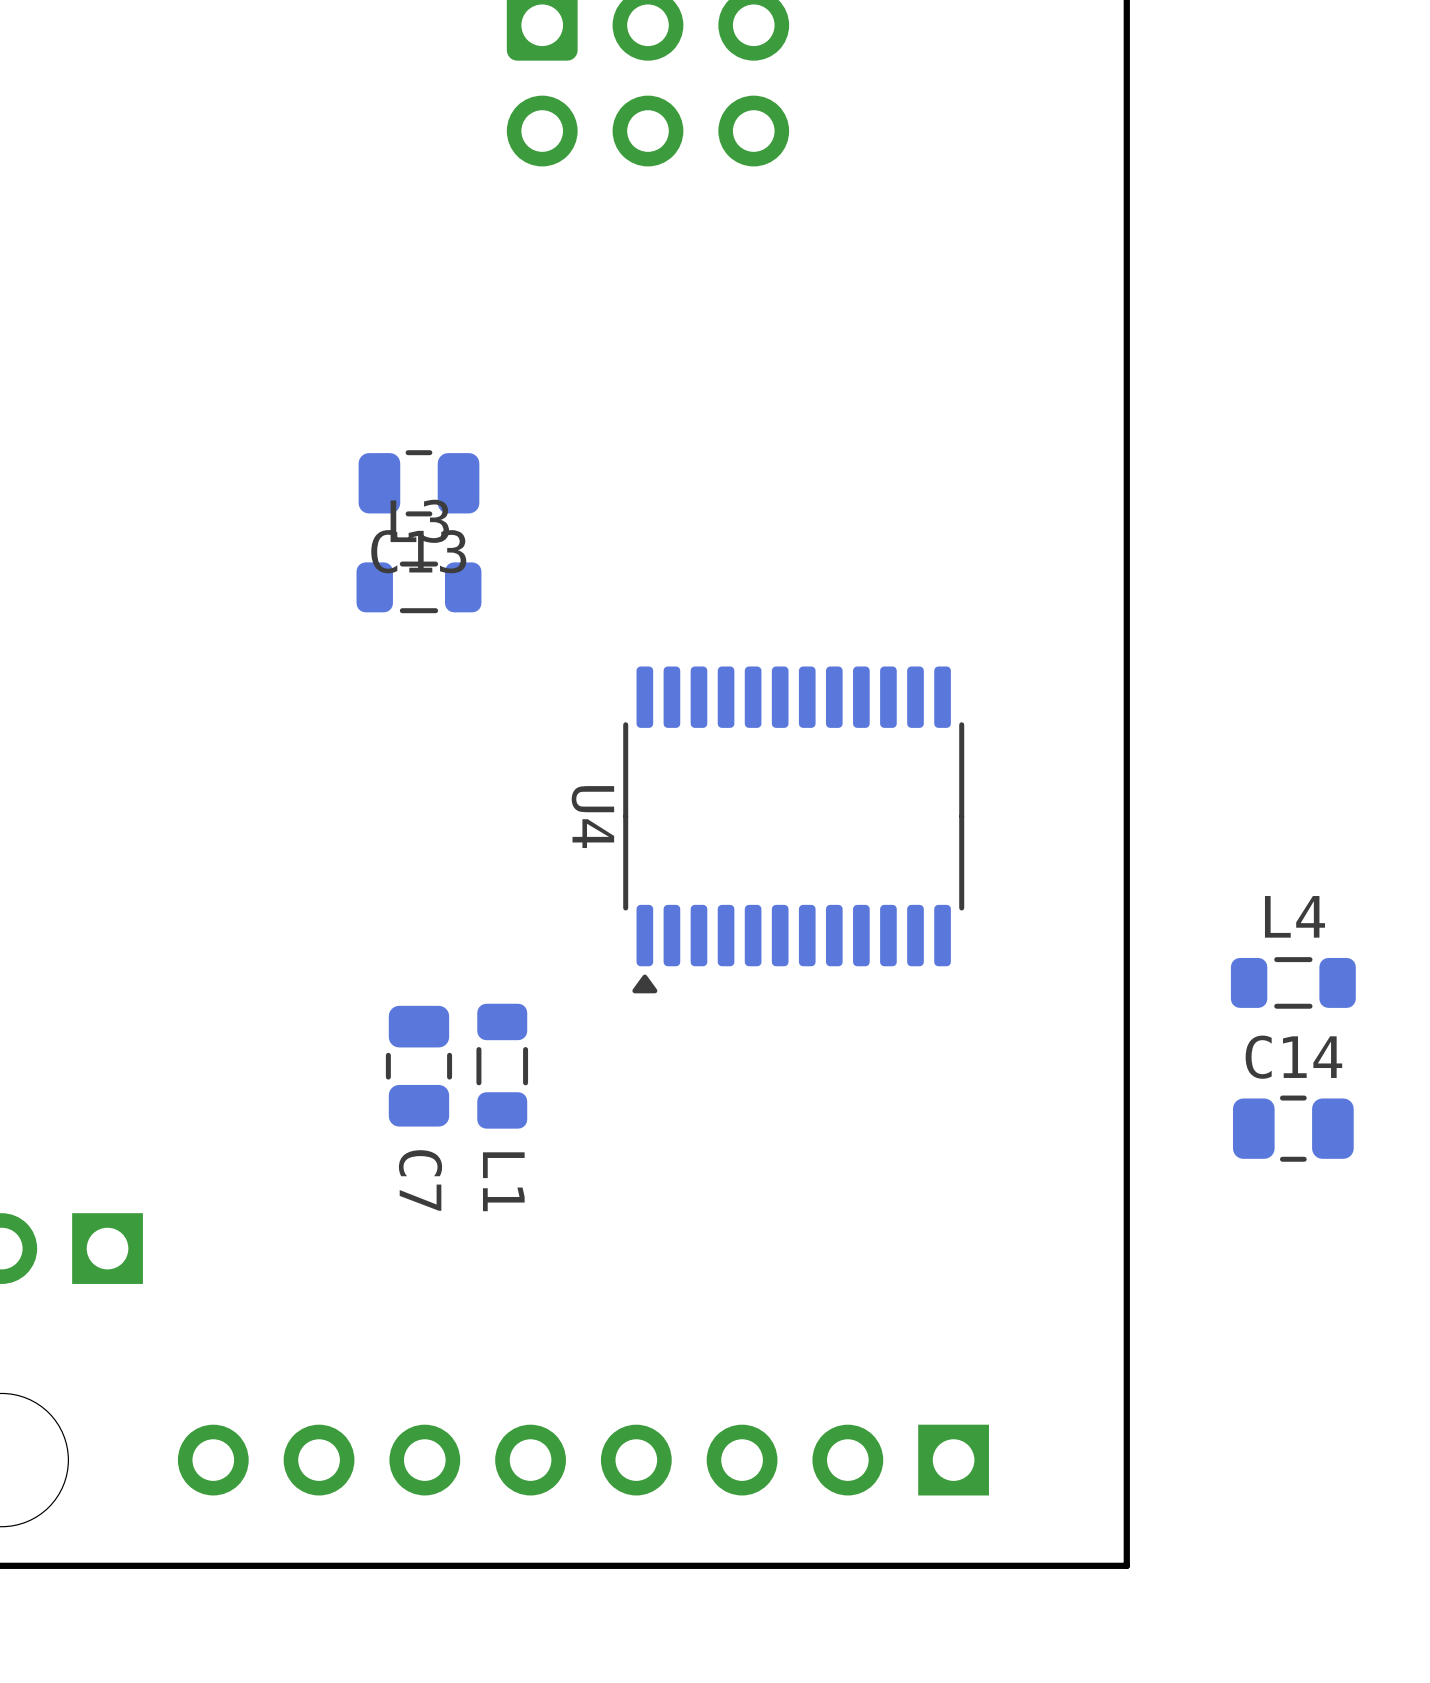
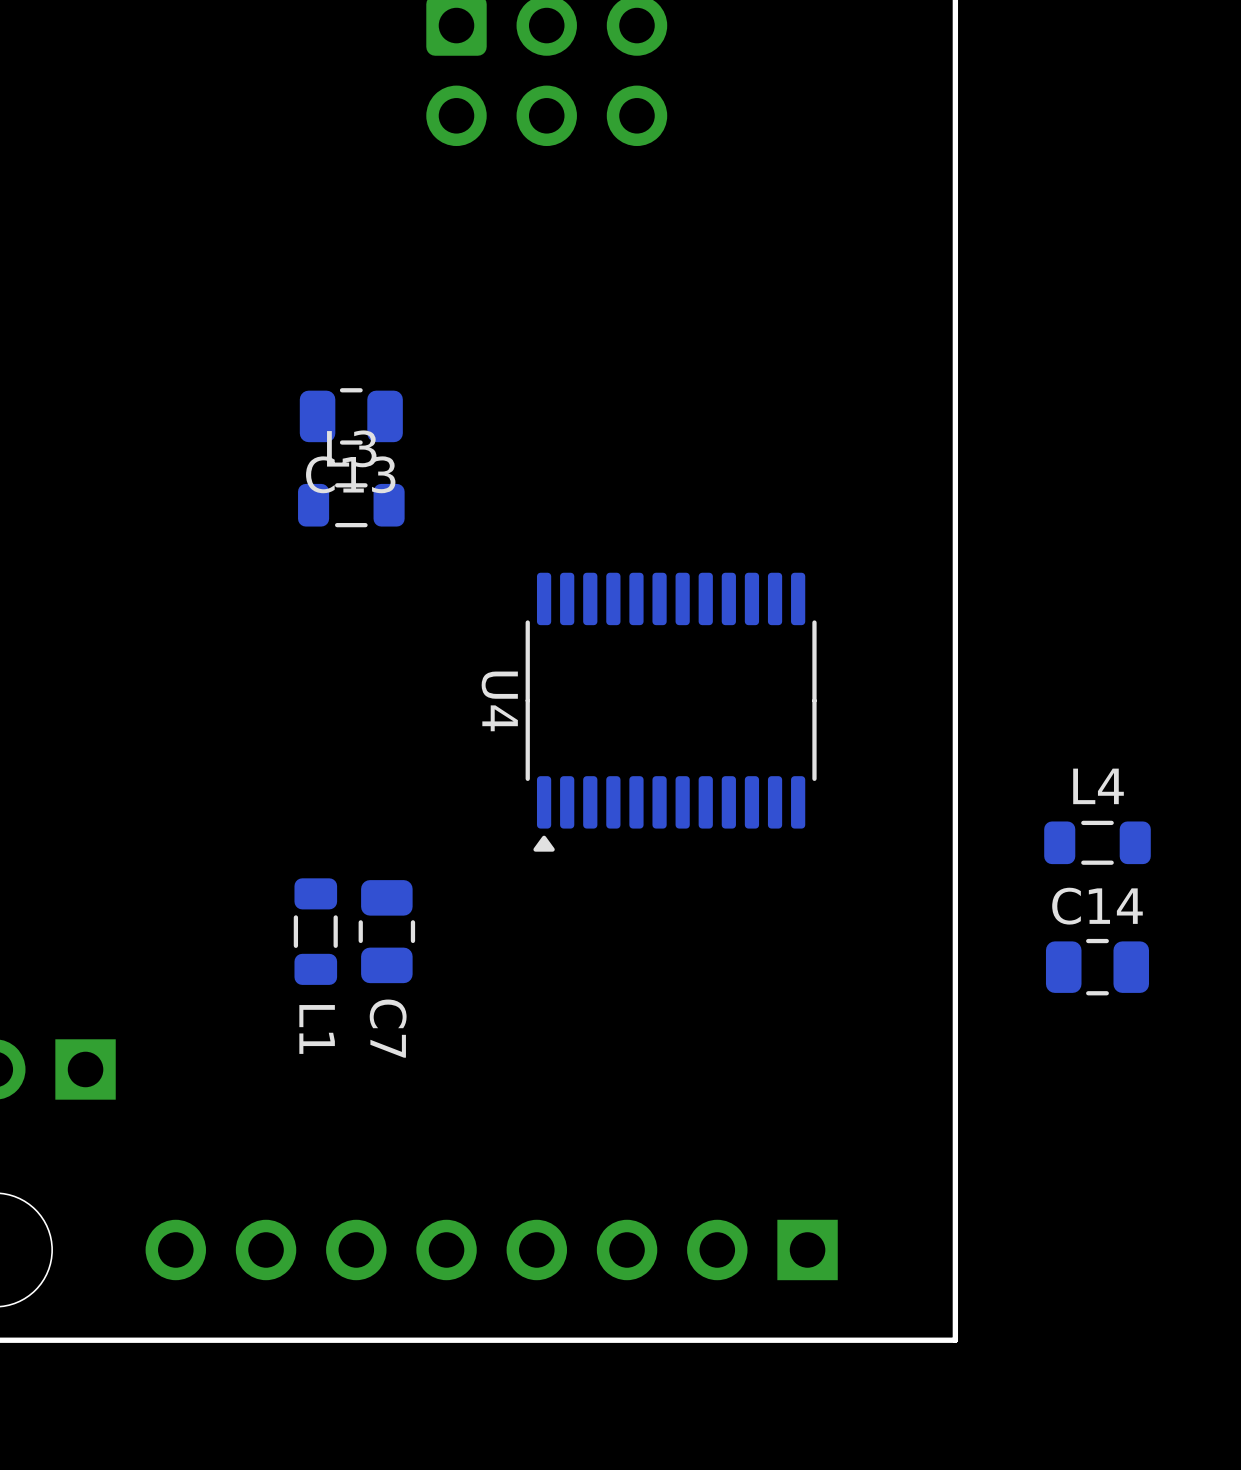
C7 position: (418, 1066) -> (386, 931)
L1 position: (502, 1066) -> (315, 931)

